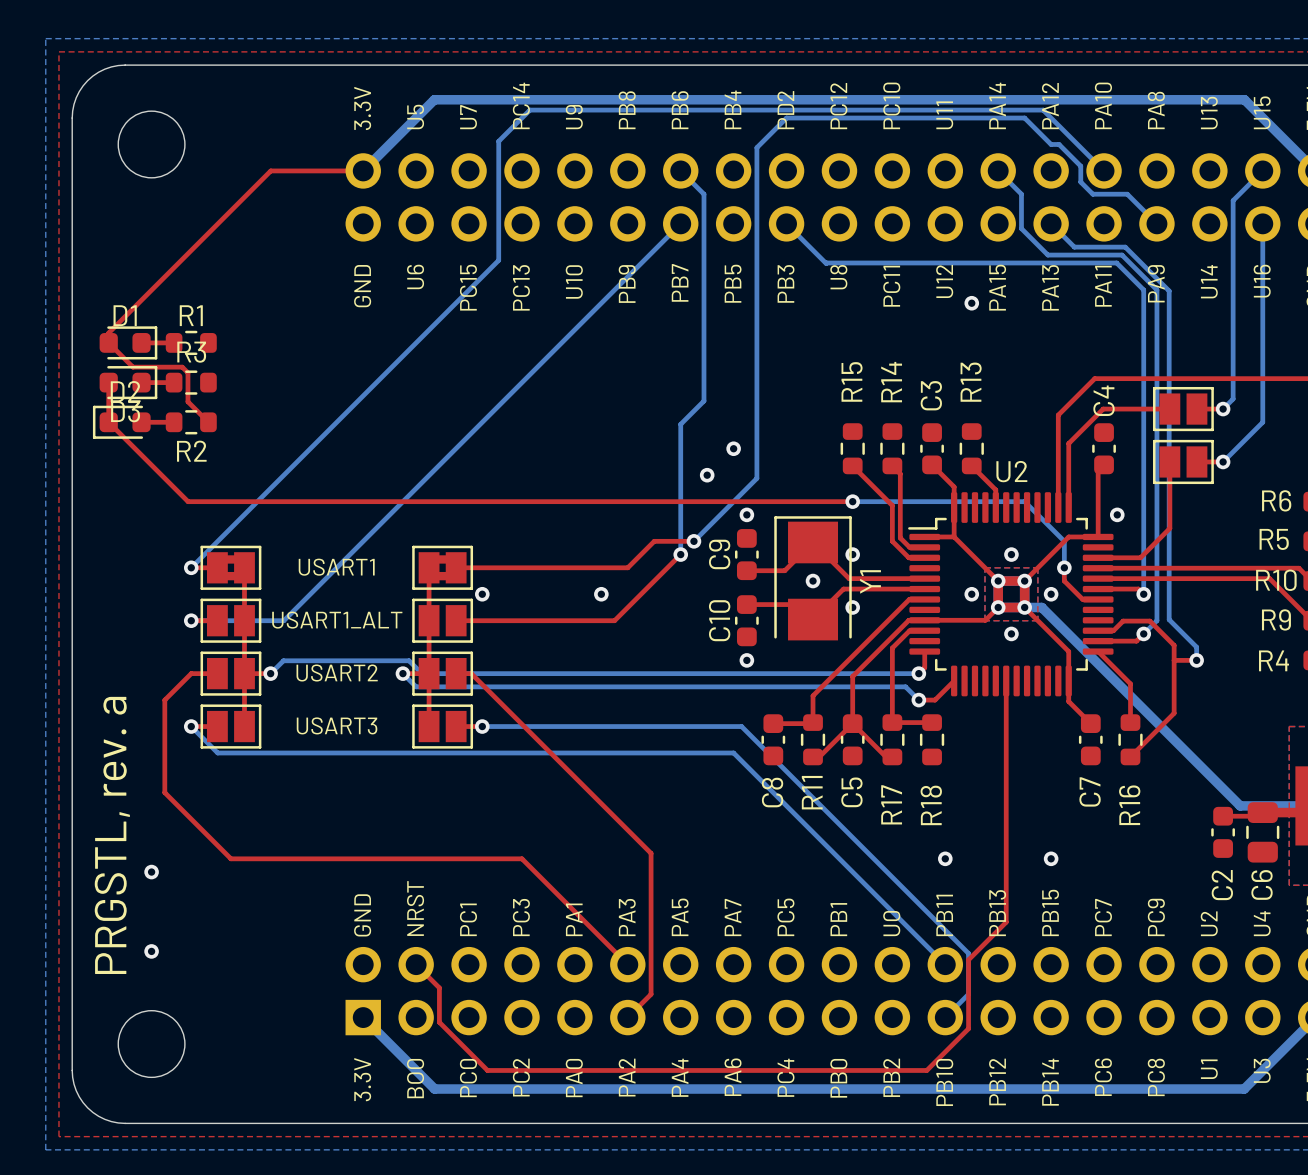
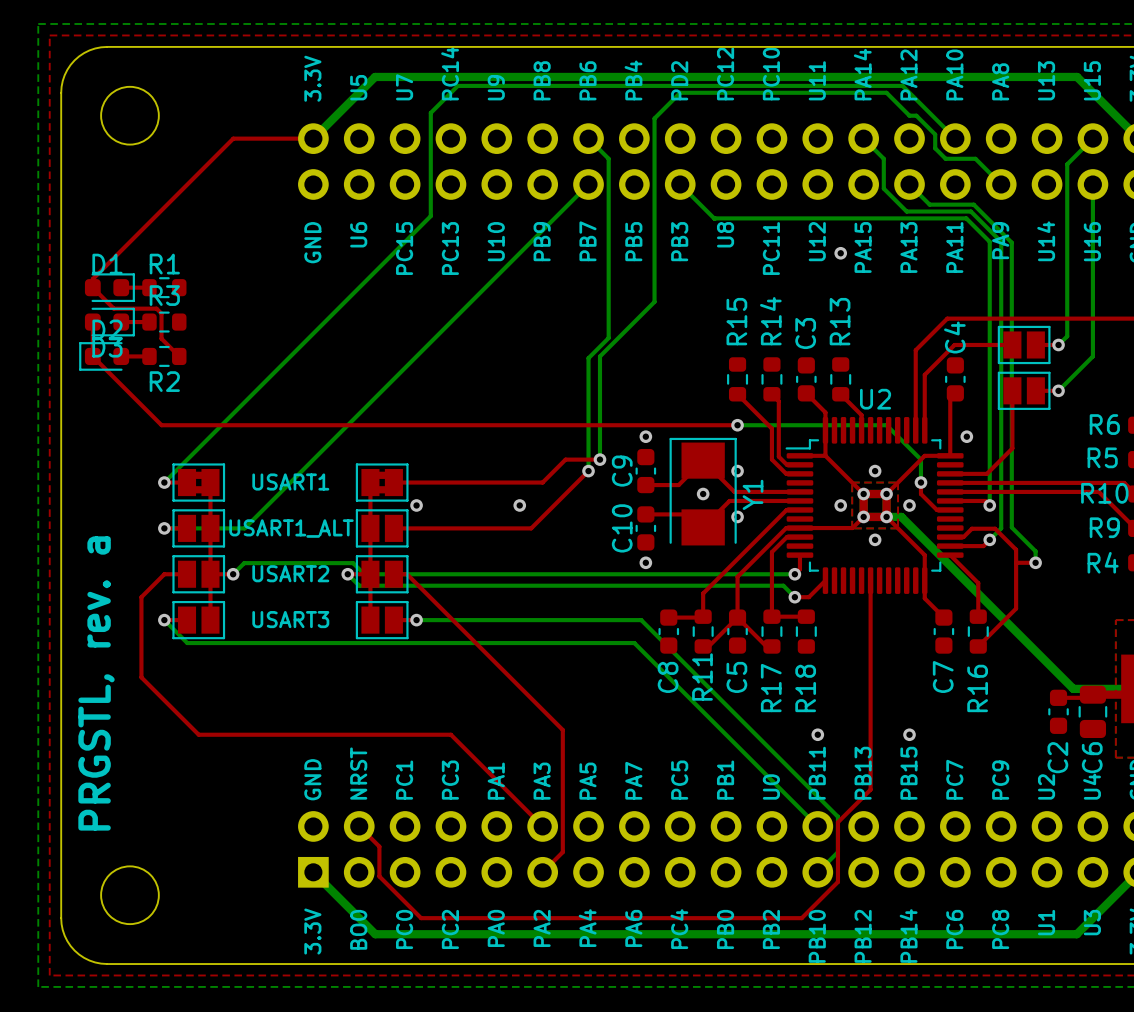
bottom track: (756, 359) (756, 478) (693, 541) -> (654, 301) (599, 356) (599, 459)
via: (733, 448) -> none
via: (707, 475) -> none
via: (151, 872) -> none
via: (151, 951) -> none

